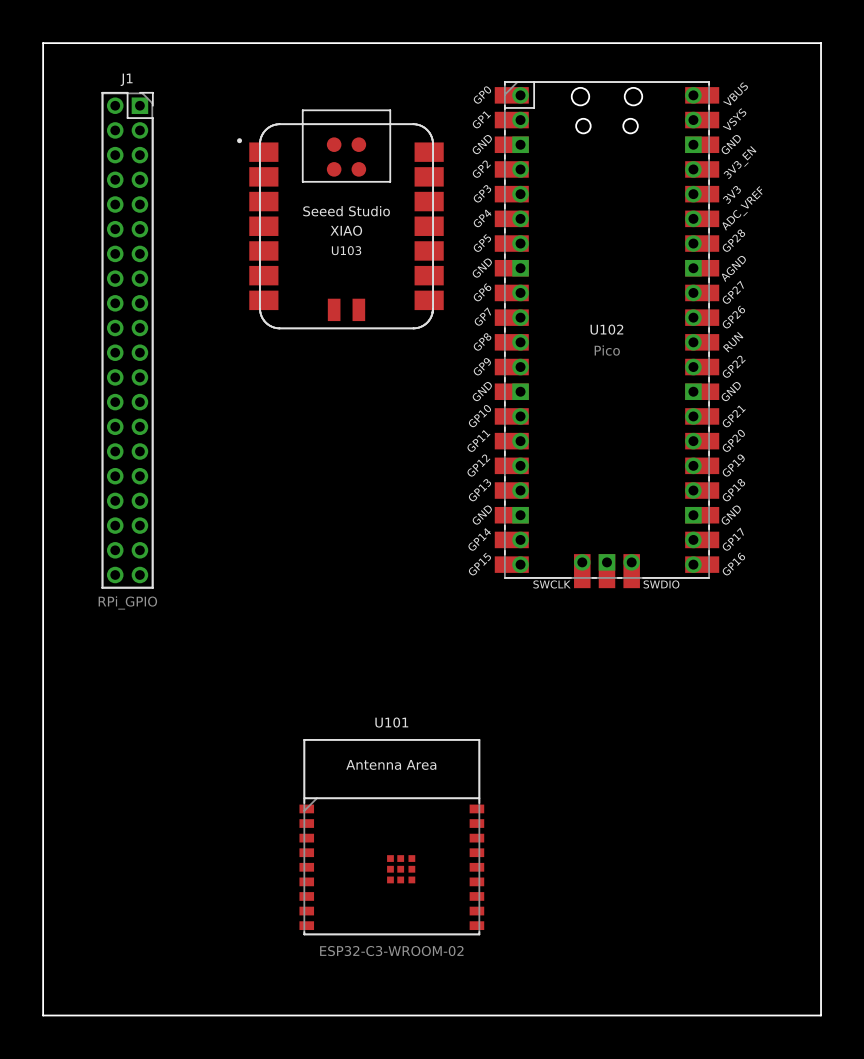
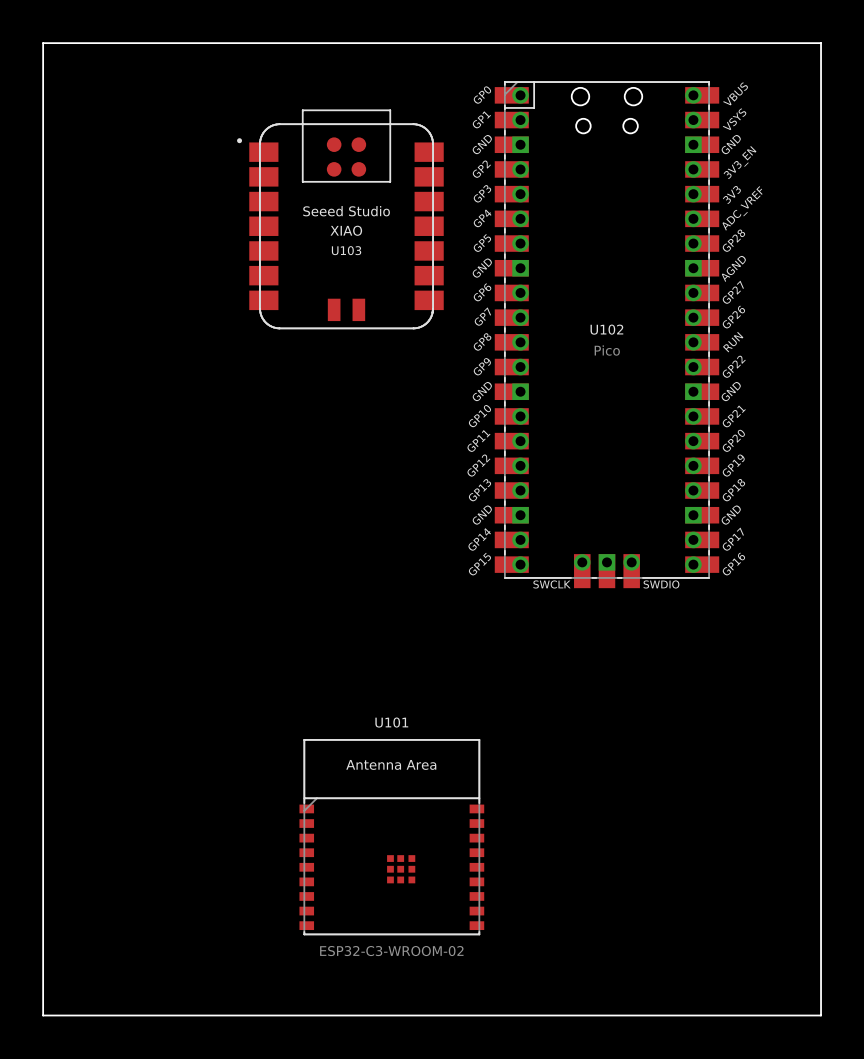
J1: RPi_GPIO (127, 340) -> none

